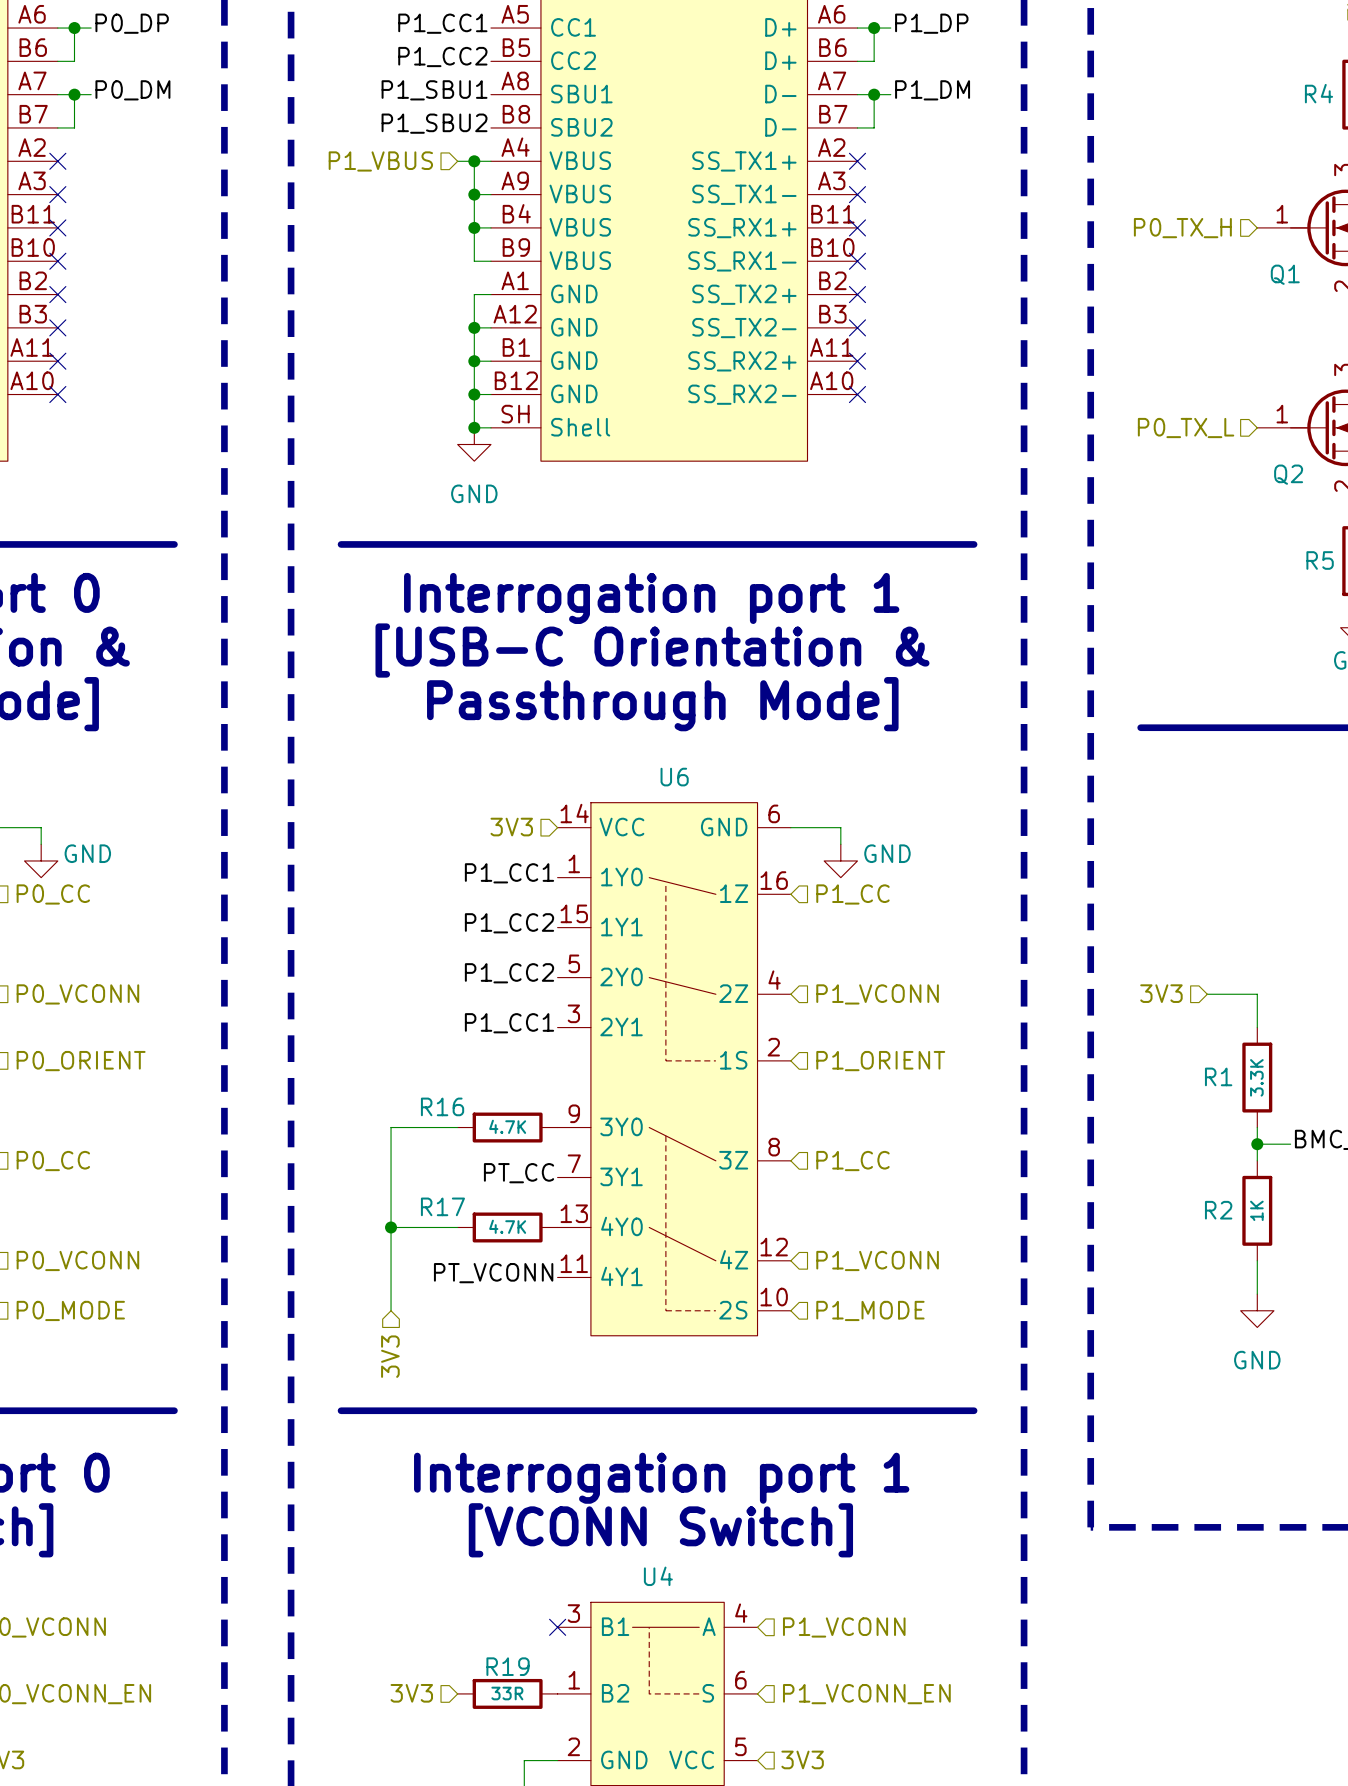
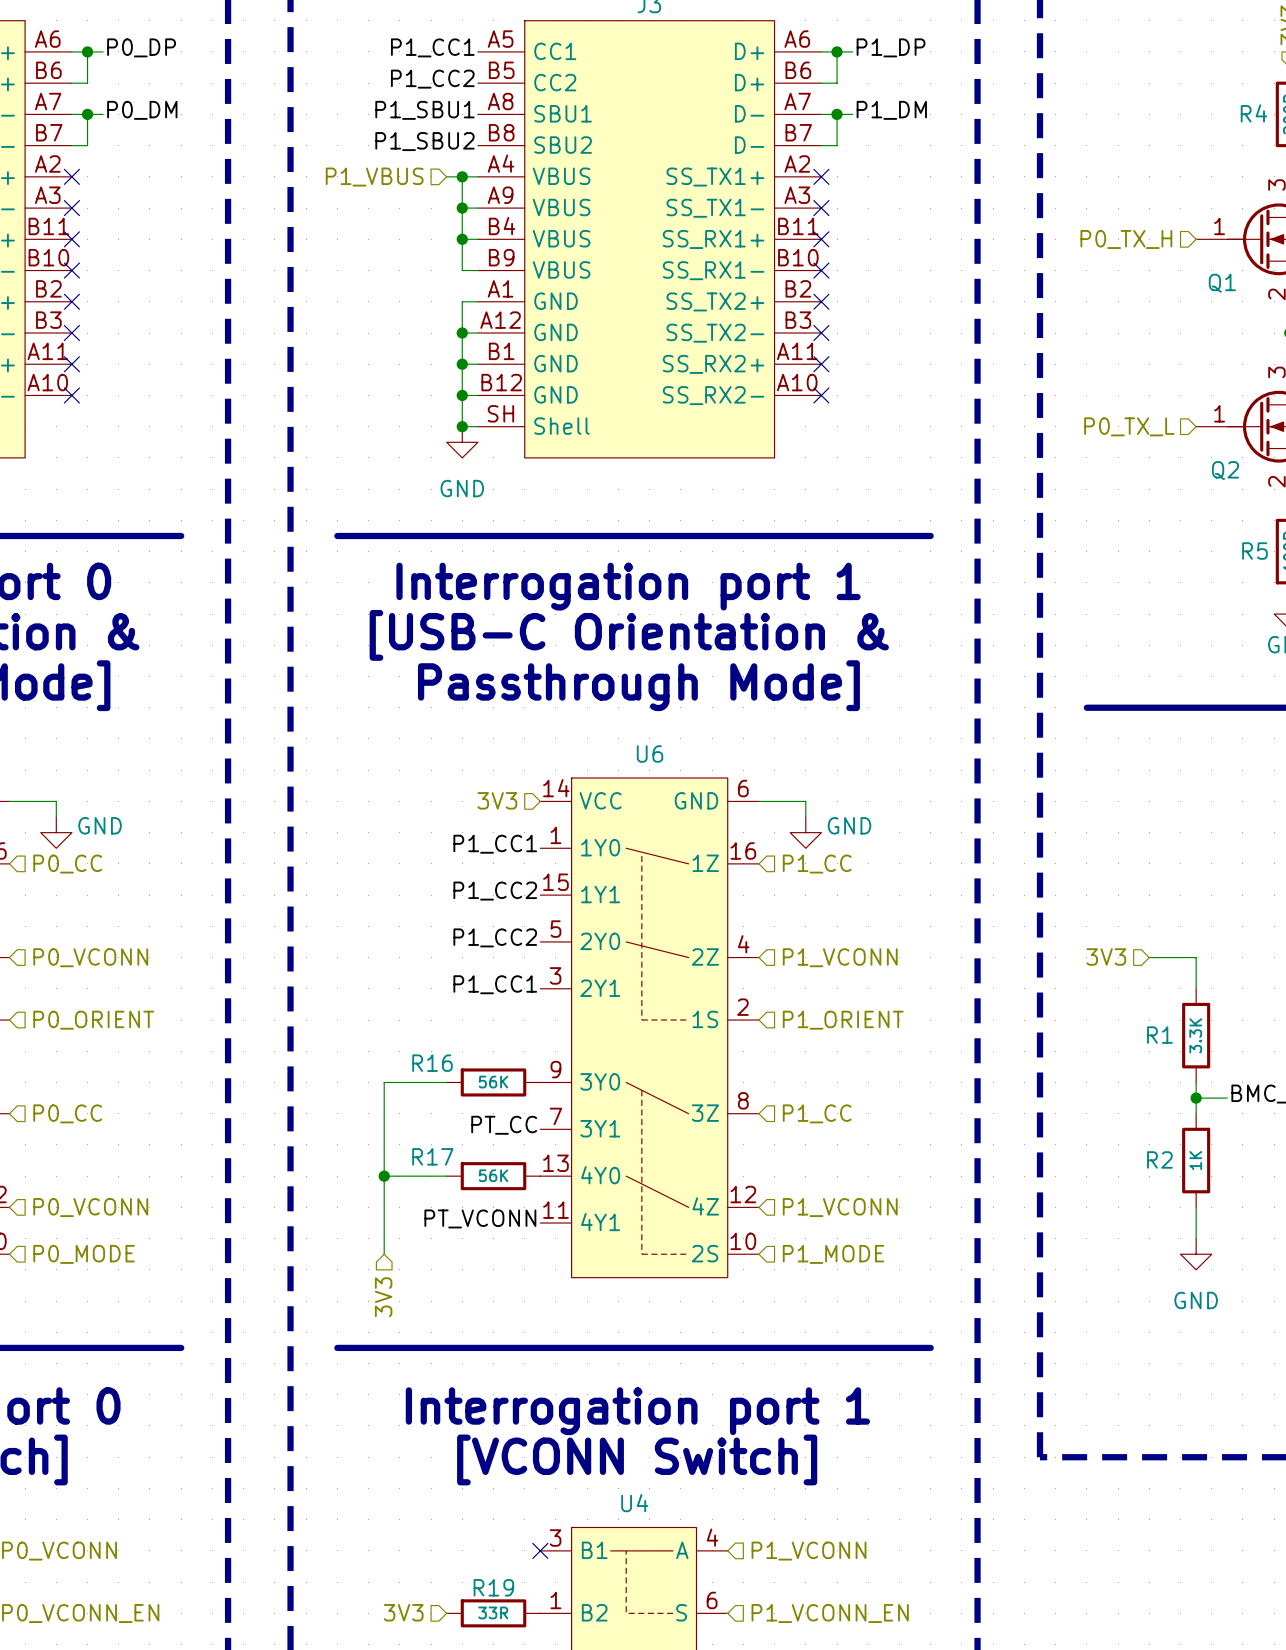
R16 value: 4.7K (507, 1126) -> 56K (493, 1082)
R17 value: 4.7K (507, 1226) -> 56K (493, 1175)

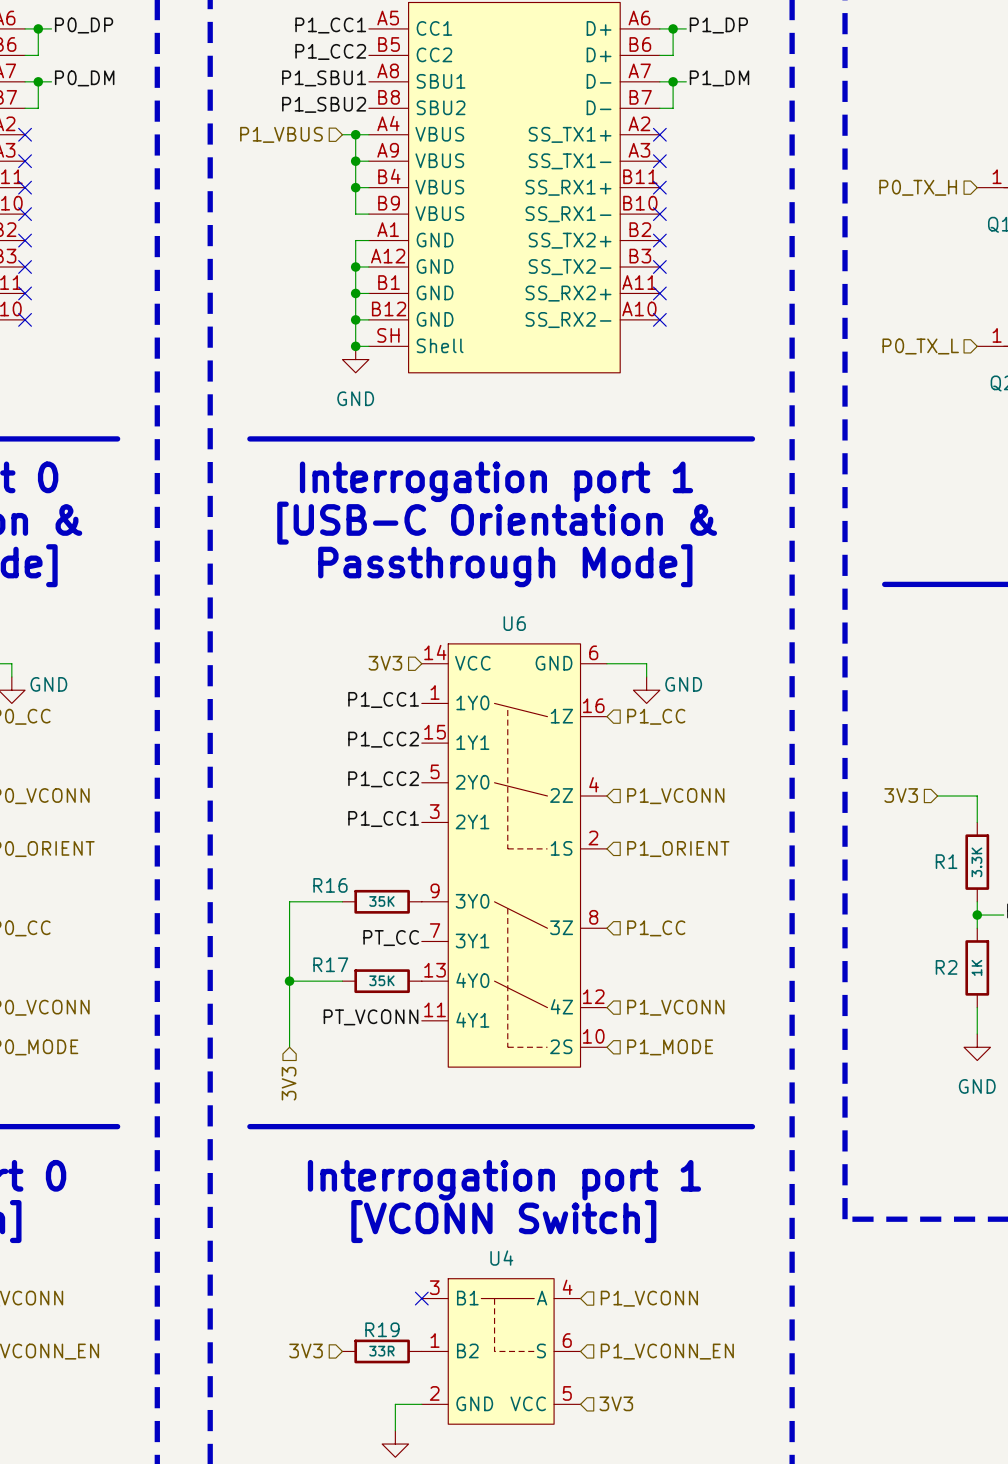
R16 value: 56K (493, 1082) -> 35K (381, 901)
R17 value: 56K (493, 1175) -> 35K (381, 980)

